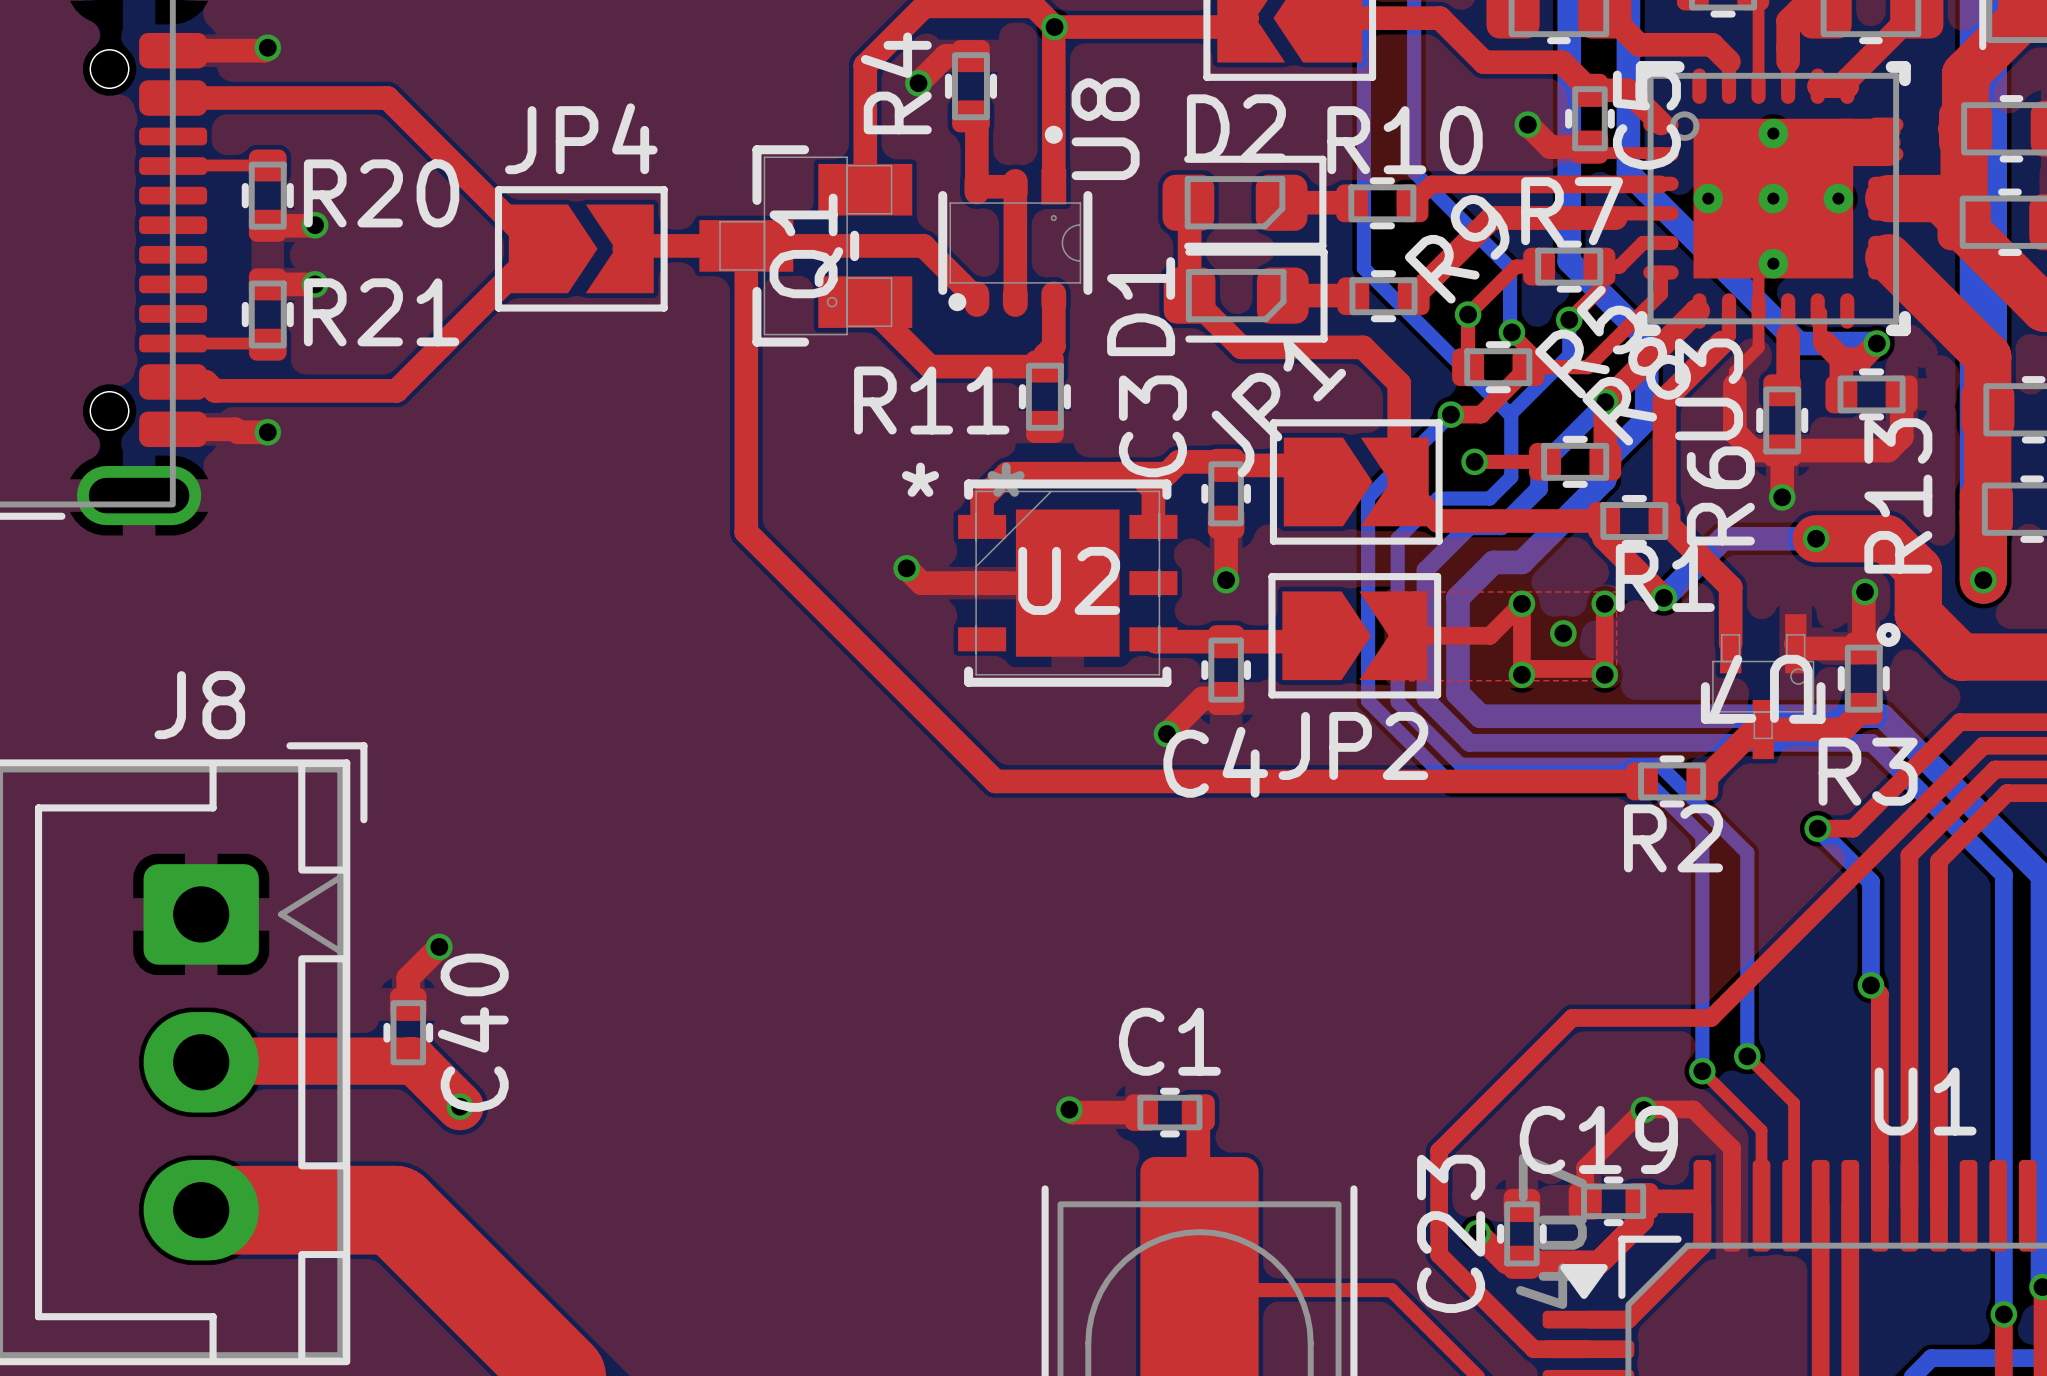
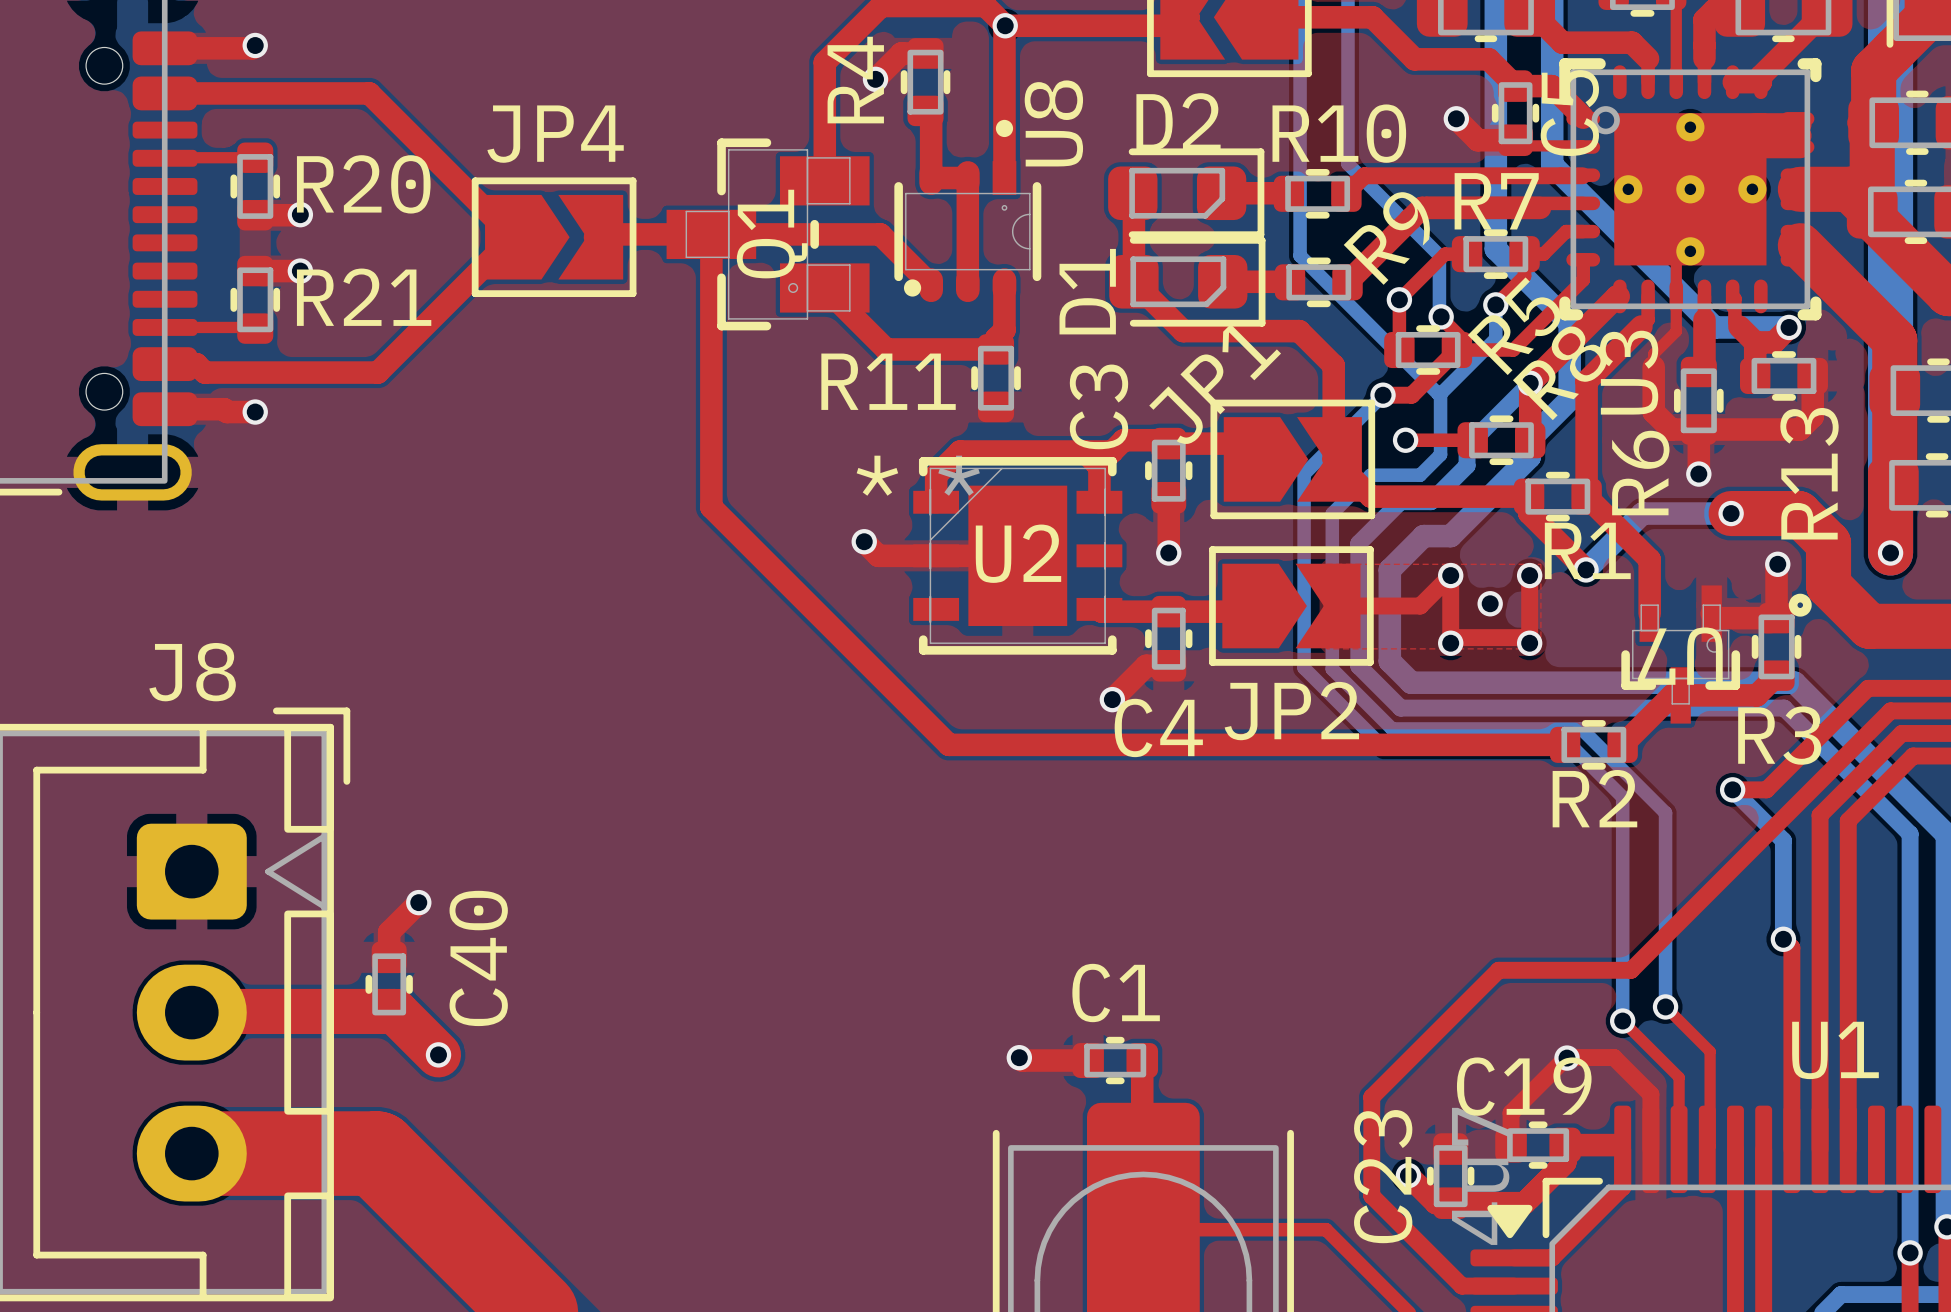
C40 name position: C40 (473, 1032) -> C40 (478, 958)

